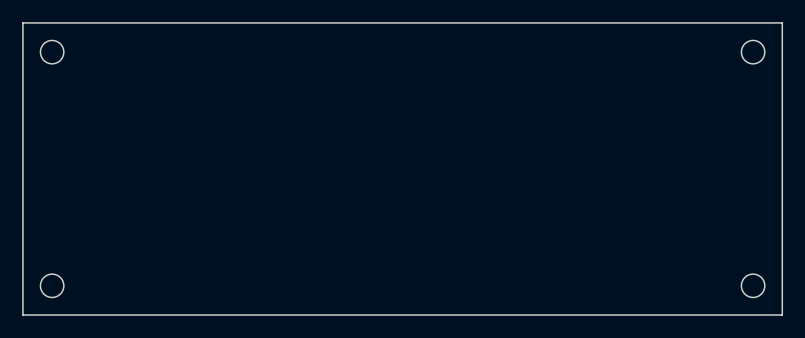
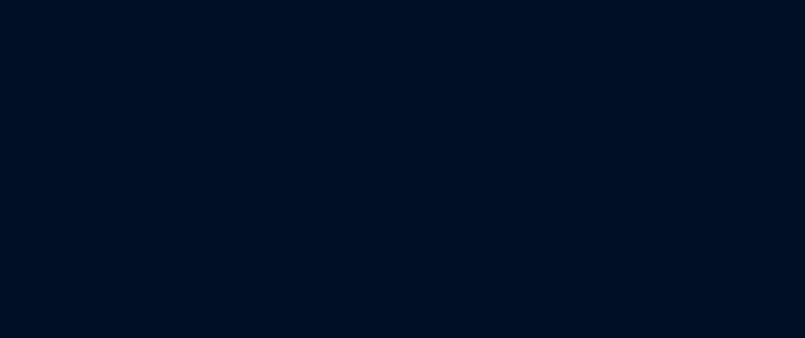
board edge: (22, 22) (782, 22) (782, 315) (22, 315) (22, 22) -> none
round board edge: [39, 39, 65, 65] -> none
round board edge: [740, 39, 766, 65] -> none
round board edge: [39, 273, 65, 298] -> none
round board edge: [740, 273, 766, 298] -> none

